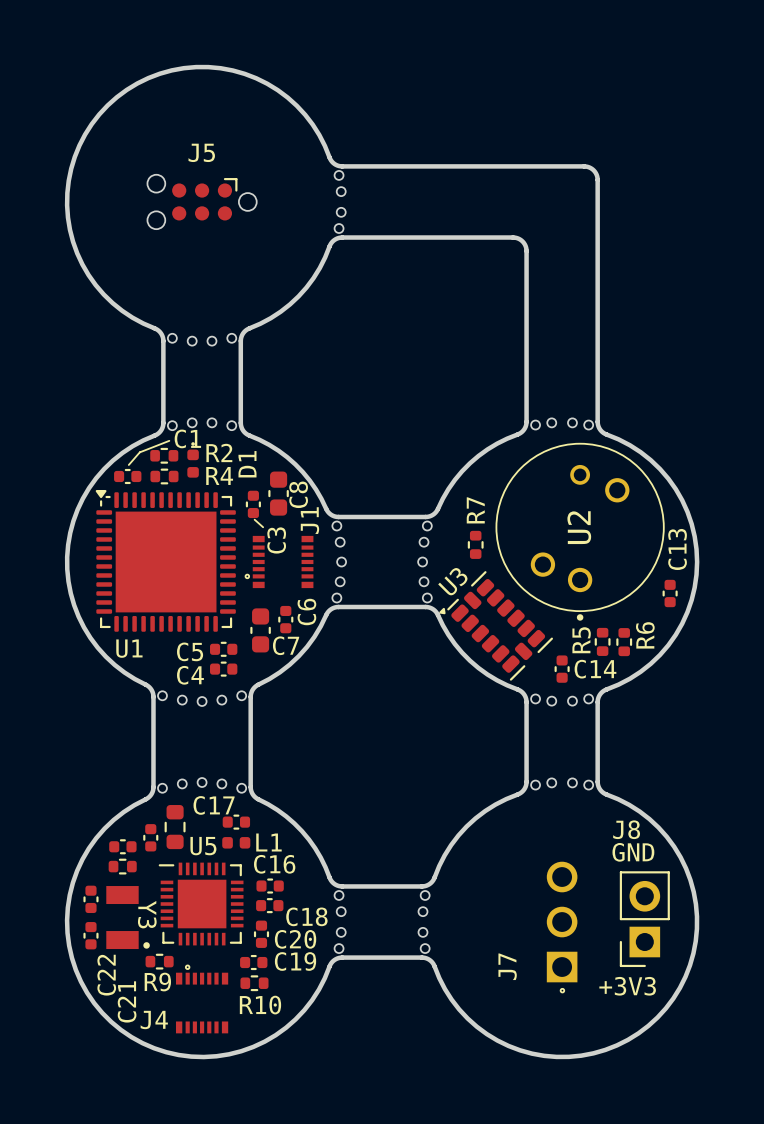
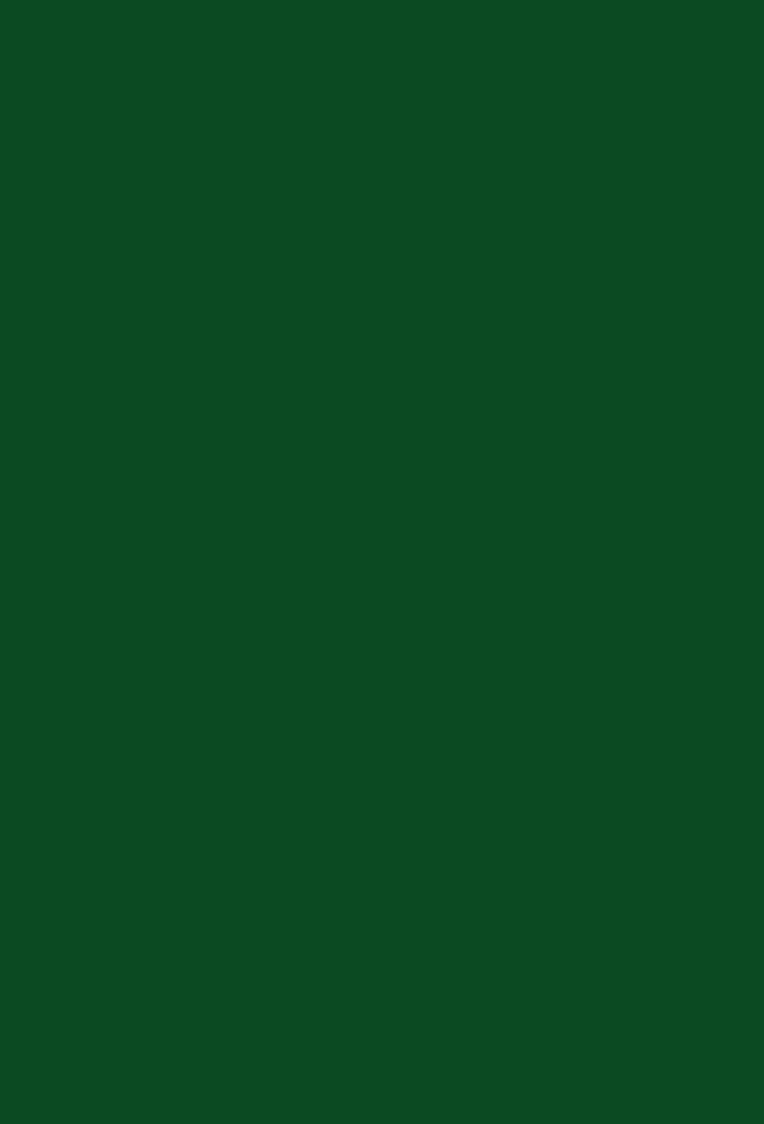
board edge: (329, 157) (312, 124) (287, 97) (256, 78) (232, 70) (208, 67) (183, 68) (159, 73) (126, 89) (107, 105) (91, 124) (74, 156) (67, 193) (67, 217) (73, 241) (88, 275) (103, 294) (122, 310) (157, 329) (161, 334) (163, 422) (158, 433) (122, 452) (96, 478) (77, 509) (68, 544) (67, 569) (70, 593) (84, 627) (105, 656) (124, 672) (148, 686) (153, 696) (152, 791) (148, 797) (123, 812) (104, 828) (82, 859) (72, 882) (67, 907) (67, 933) (71, 957) (87, 992) (111, 1021) (142, 1043) (178, 1054) (203, 1057) (229, 1054) (253, 1046) (275, 1035) (304, 1010) (318, 989) (330, 963) (335, 959) (342, 957) (428, 959) (433, 963) (451, 999) (467, 1018) (497, 1040) (520, 1050) (544, 1055) (568, 1056) (605, 1049) (628, 1039) (648, 1025) (673, 998) (685, 976) (693, 953) (697, 916) (690, 880) (680, 857) (666, 836) (639, 811) (603, 793) (598, 786) (598, 698) (603, 690) (640, 671) (668, 645) (682, 623) (691, 599) (697, 561) (691, 524) (682, 500) (668, 478) (640, 452) (603, 433) (598, 425) (597, 176) (593, 170) (585, 166) (342, 166) (334, 163) (329, 157) -> none
J5: (202, 201) -> none
part: (340, 201) -> none
board edge: (342, 237) (513, 237) (521, 240) (526, 247) (525, 426) (520, 433) (497, 443) (469, 463) (448, 489) (436, 511) (430, 516) (332, 515) (326, 510) (309, 480) (295, 464) (269, 444) (246, 434) (241, 427) (240, 341) (242, 334) (248, 329) (280, 311) (298, 296) (319, 268) (330, 243) (335, 239) (342, 237) -> none
part: (202, 339) -> none
part: (562, 423) -> none
part: (202, 424) -> none
line: (169, 440) (139, 452) (128, 464) -> none
R4: (164, 455) -> none
D1: (193, 459) -> none
C1: (127, 476) -> none
R2: (164, 476) -> none
C8: (278, 493) -> none
C3: (253, 504) -> none
line: (254, 519) (263, 527) -> none
U2: (580, 531) -> none
R7: (475, 544) -> none
U1: (165, 560) -> none
J1: (279, 561) -> none
part: (339, 561) -> none
part: (424, 561) -> none
C13: (670, 593) -> none
board edge: (338, 607) (431, 608) (437, 613) (454, 644) (469, 660) (497, 680) (520, 690) (526, 698) (526, 781) (524, 788) (519, 793) (485, 811) (466, 826) (444, 855) (433, 880) (425, 886) (342, 886) (335, 884) (330, 878) (315, 848) (301, 831) (277, 809) (255, 797) (251, 791) (252, 690) (257, 685) (279, 672) (298, 656) (314, 636) (327, 612) (338, 607) -> none
C6: (285, 619) -> none
U3: (496, 625) -> none
C7: (260, 630) -> none
R5: (602, 641) -> none
R6: (624, 642) -> none
C5: (223, 649) -> none
C4: (223, 669) -> none
C14: (562, 669) -> none
part: (202, 698) -> none
part: (562, 700) -> none
part: (562, 783) -> none
part: (202, 785) -> none
C17: (236, 822) -> none
part: (175, 827) -> none
part: (150, 837) -> none
L1: (236, 842) -> none
part: (122, 846) -> none
text: GND (633, 852) -> none
part: (122, 866) -> none
C16: (270, 886) -> none
C22: (90, 899) -> none
U5: (201, 904) -> none
C18: (269, 905) -> none
Y3: (128, 917) -> none
J8: (644, 919) -> none
part: (340, 922) -> none
part: (424, 922) -> none
J7: (562, 927) -> none
C20: (261, 934) -> none
C21: (90, 935) -> none
R9: (159, 961) -> none
C19: (253, 962) -> none
R10: (254, 983) -> none
text: +3V3 (627, 986) -> none
J4: (202, 998) -> none

